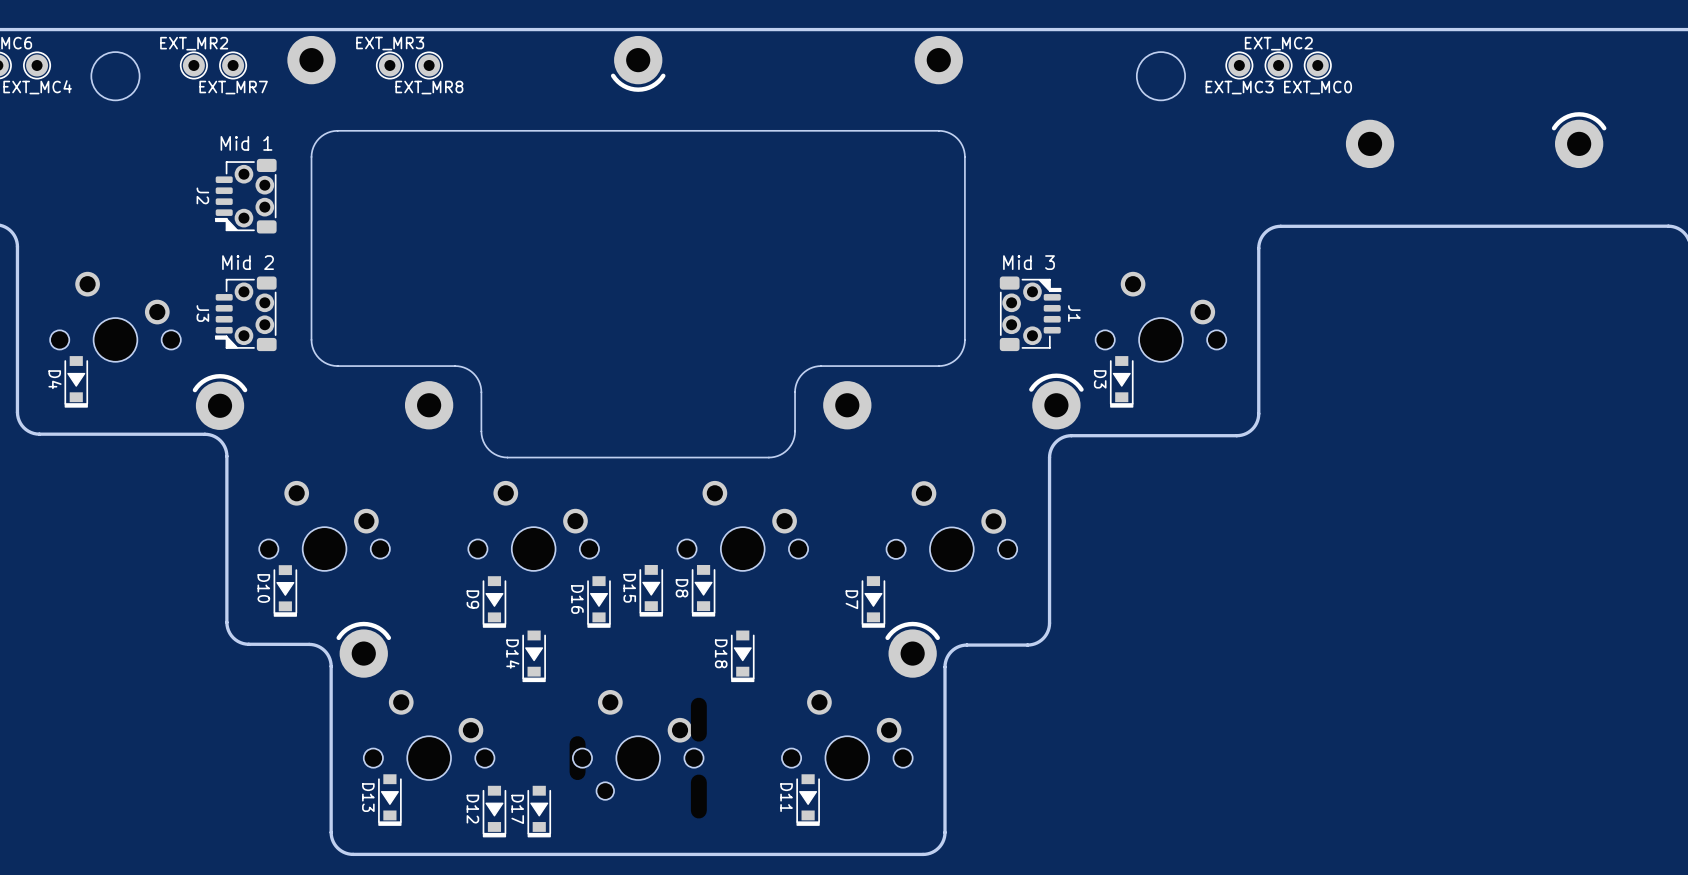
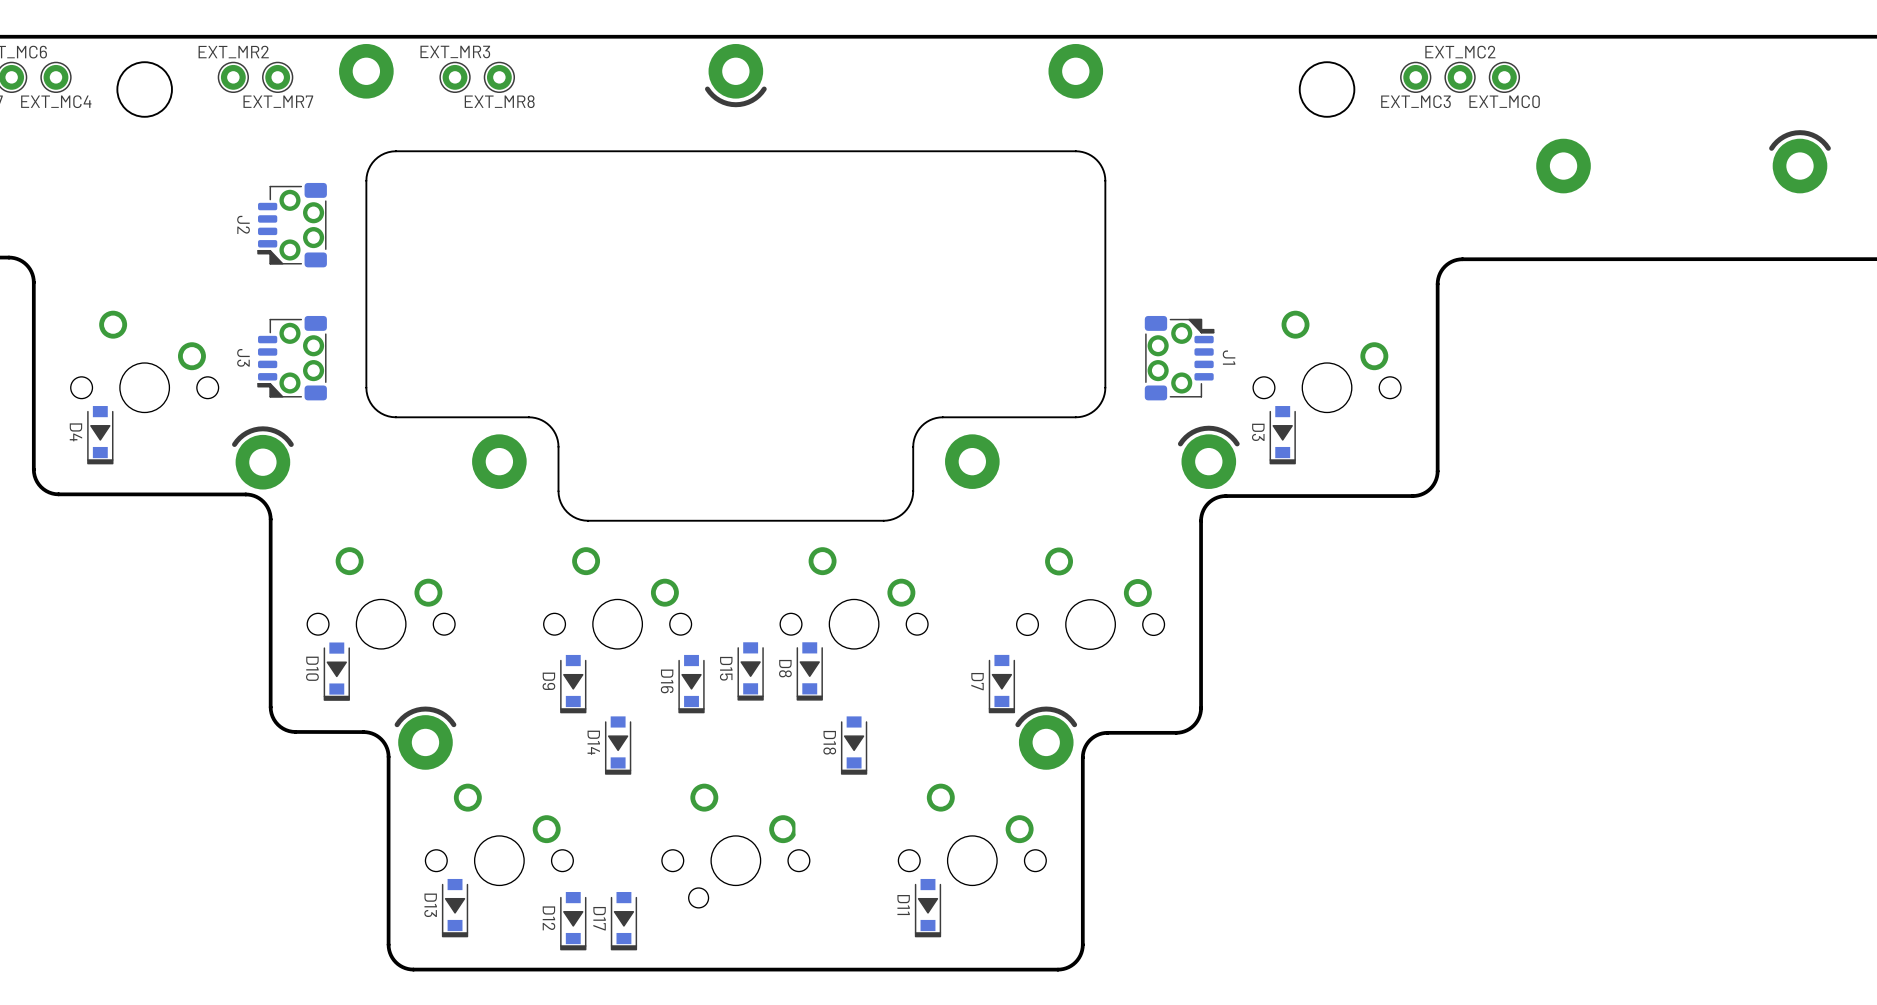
text: Mid 1 (246, 143) -> none
text: Mid 2 (248, 262) -> none
text: Mid 3 (1029, 262) -> none

